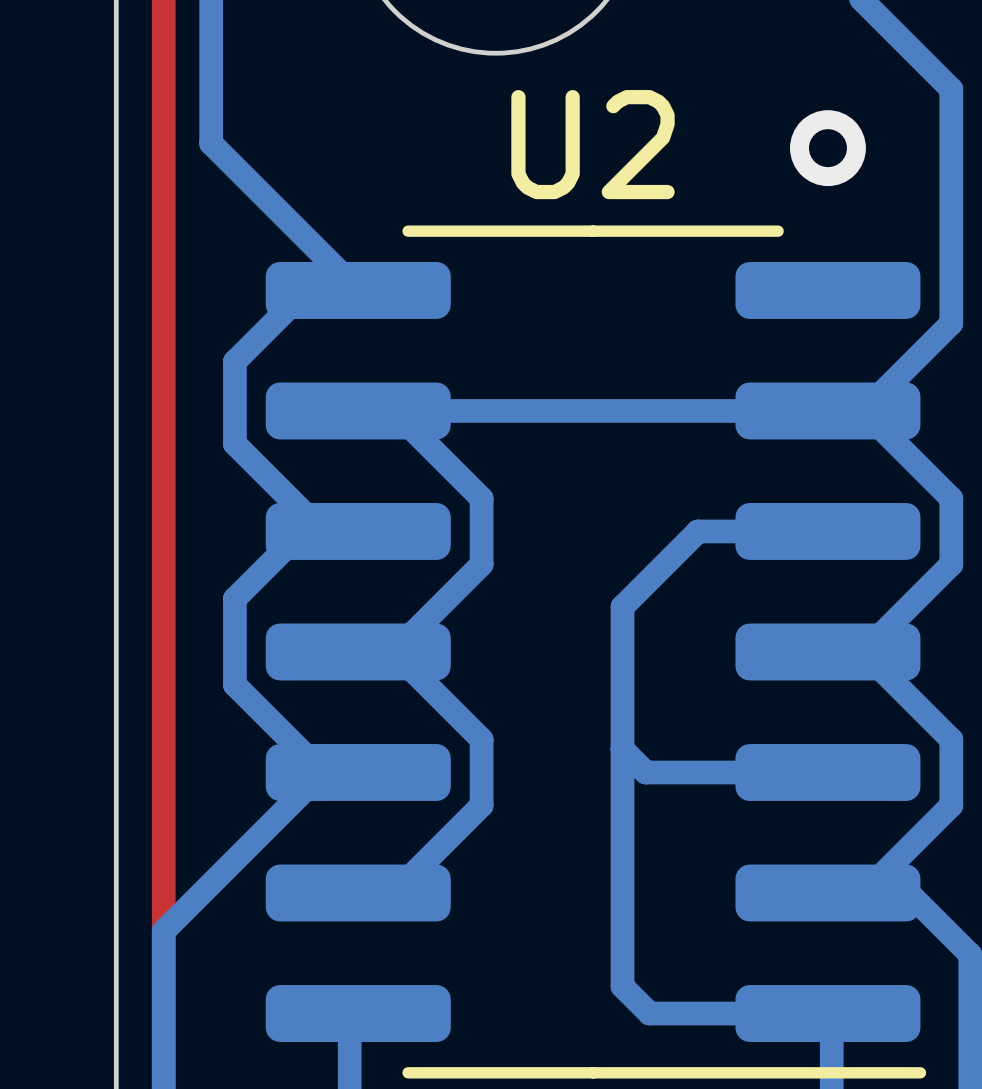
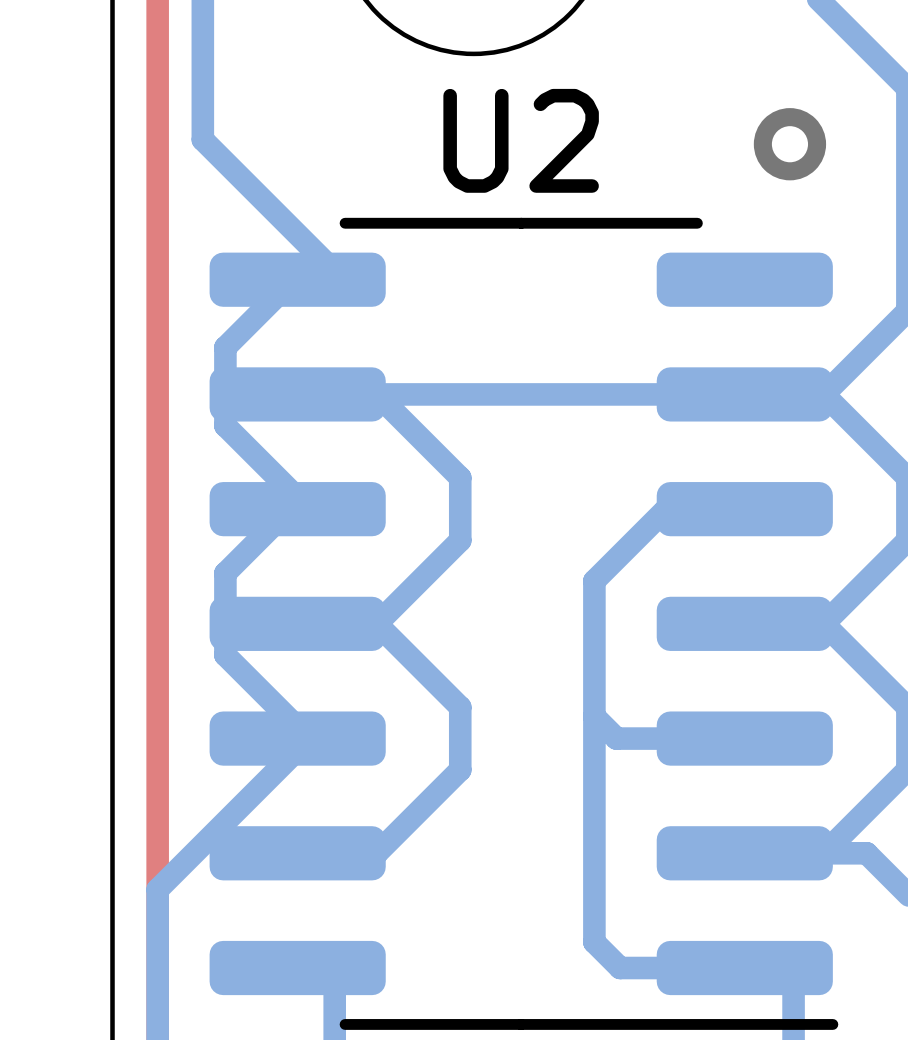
U2 position: (595, 651) -> (523, 623)

